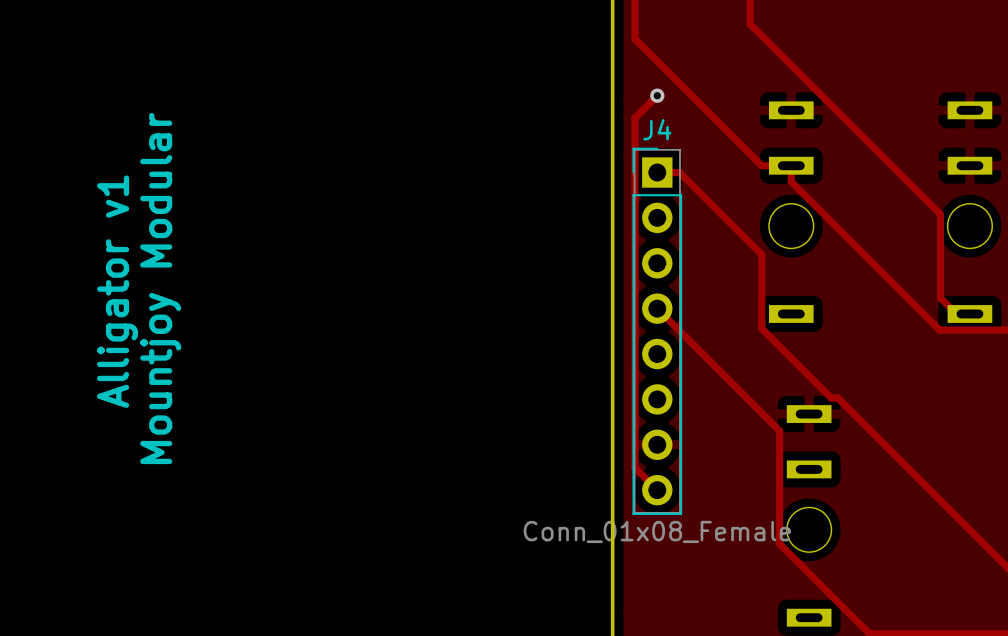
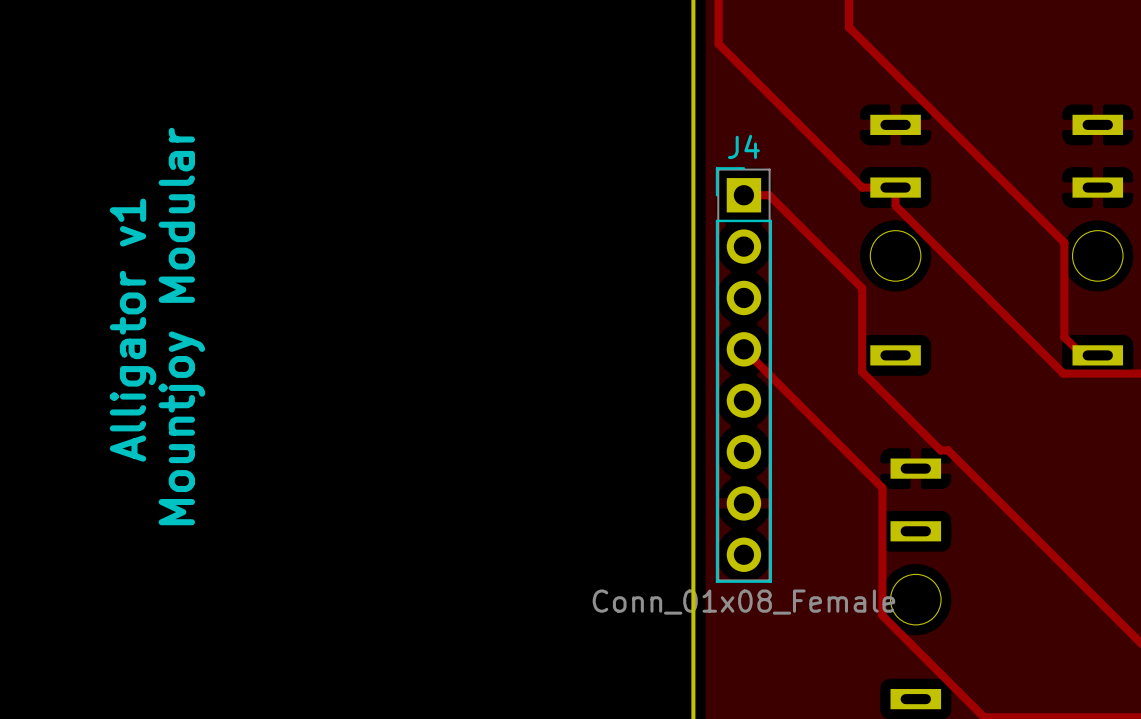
track: (657, 95) (634, 118) (634, 467) (657, 490) -> none
via: (657, 95) -> none

